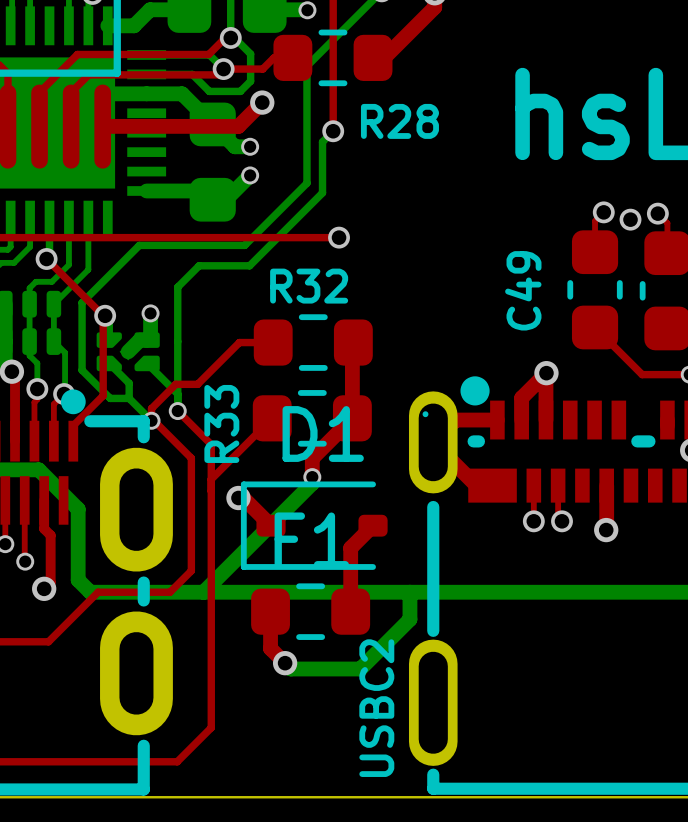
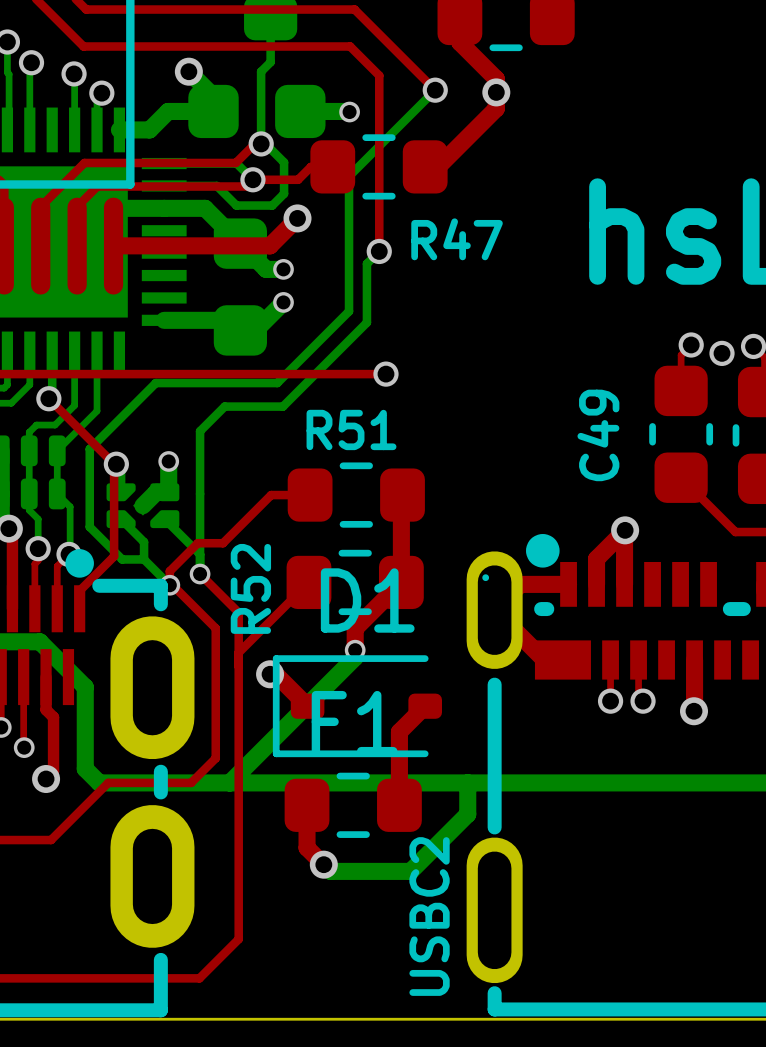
R28 name: R28 (399, 121) -> R47 (457, 239)
R32 name: R32 (309, 286) -> R51 (351, 429)
R33 name: R33 (221, 423) -> R52 (250, 588)

